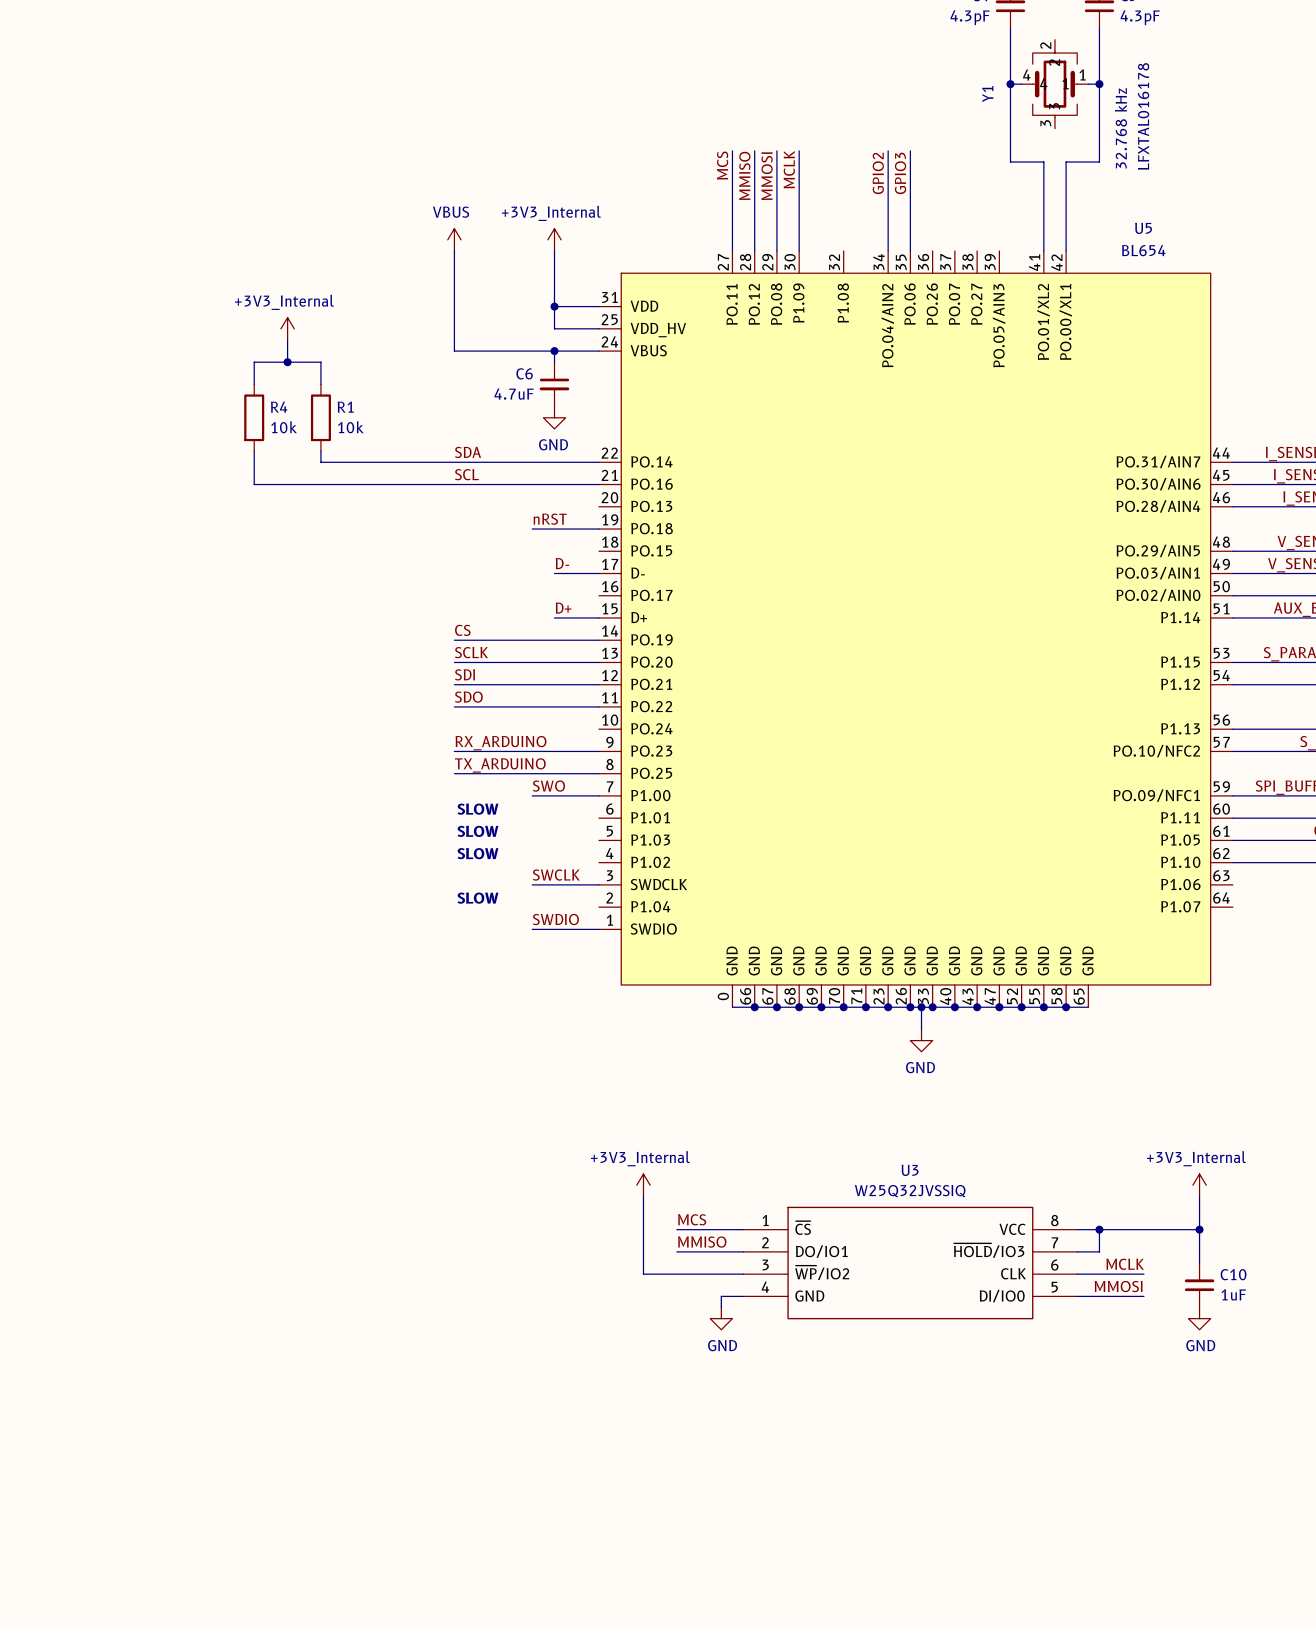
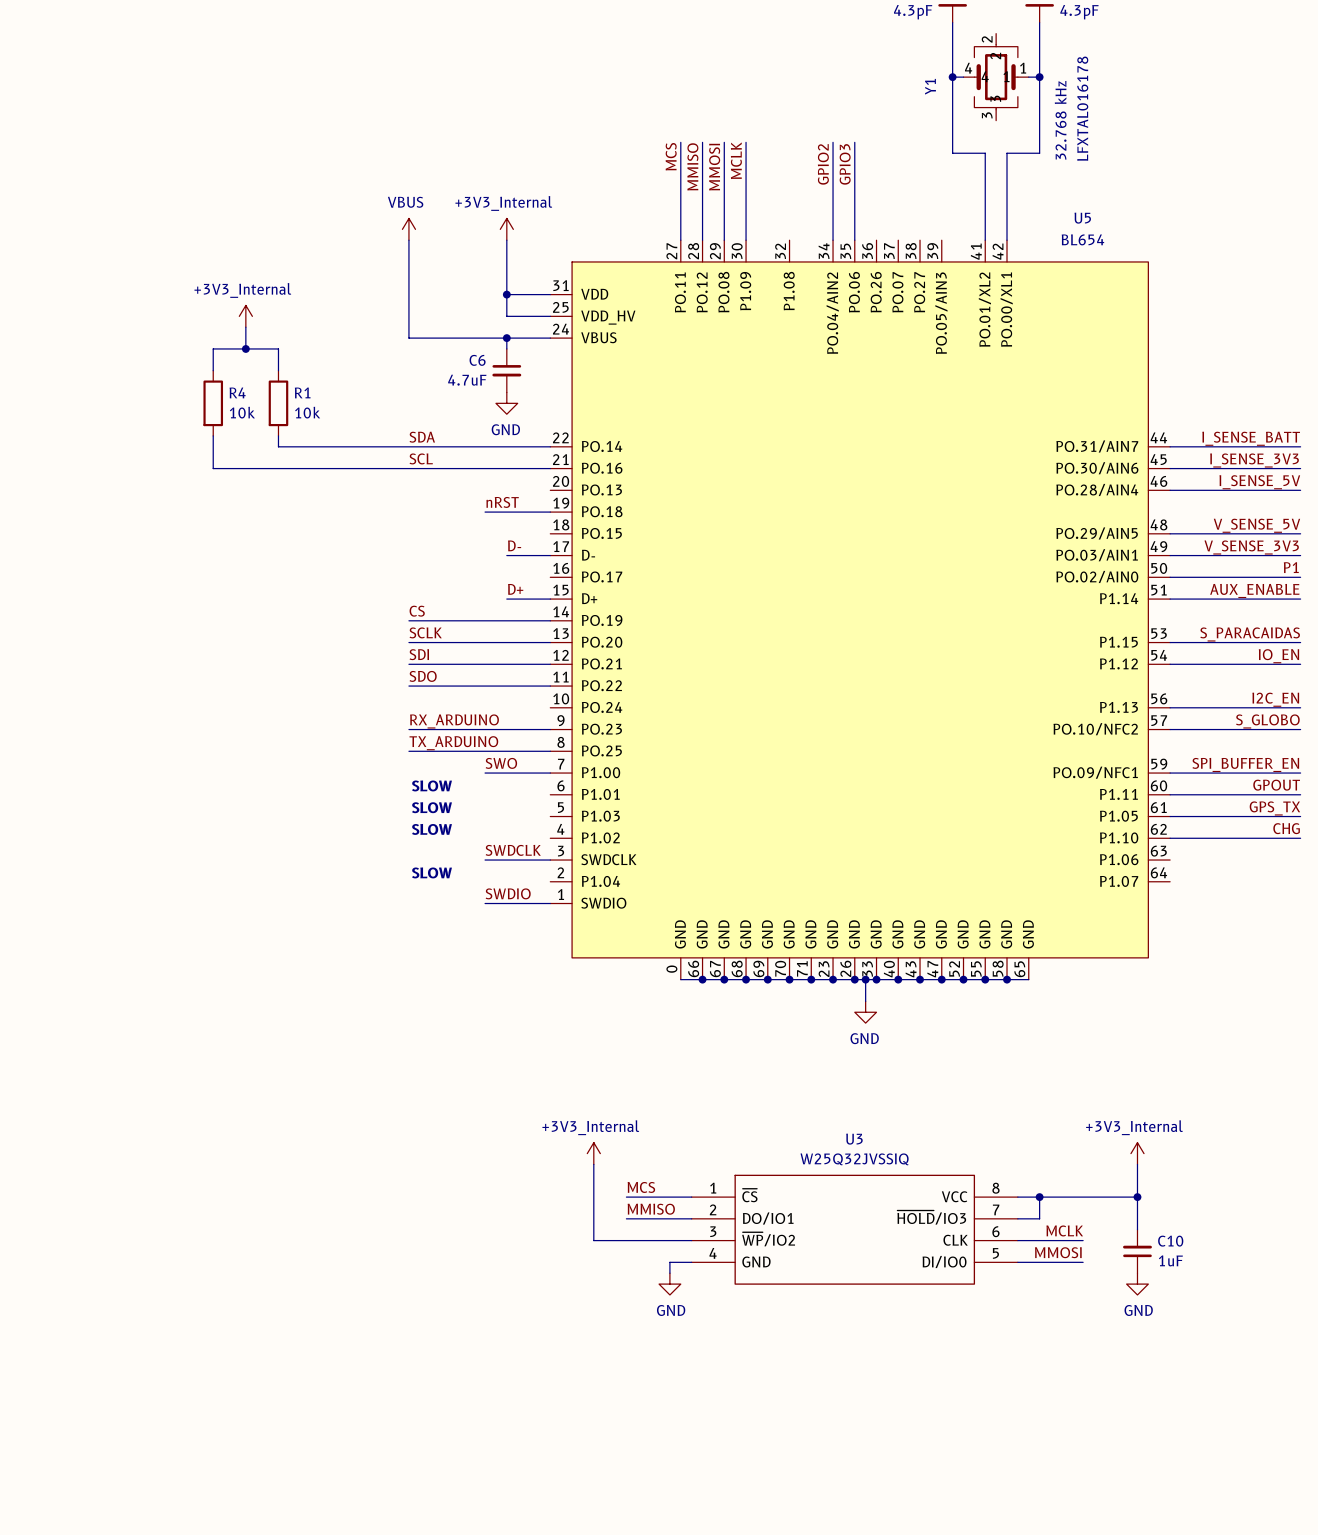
label: SWCLK (556, 875) -> SWDCLK (513, 850)

